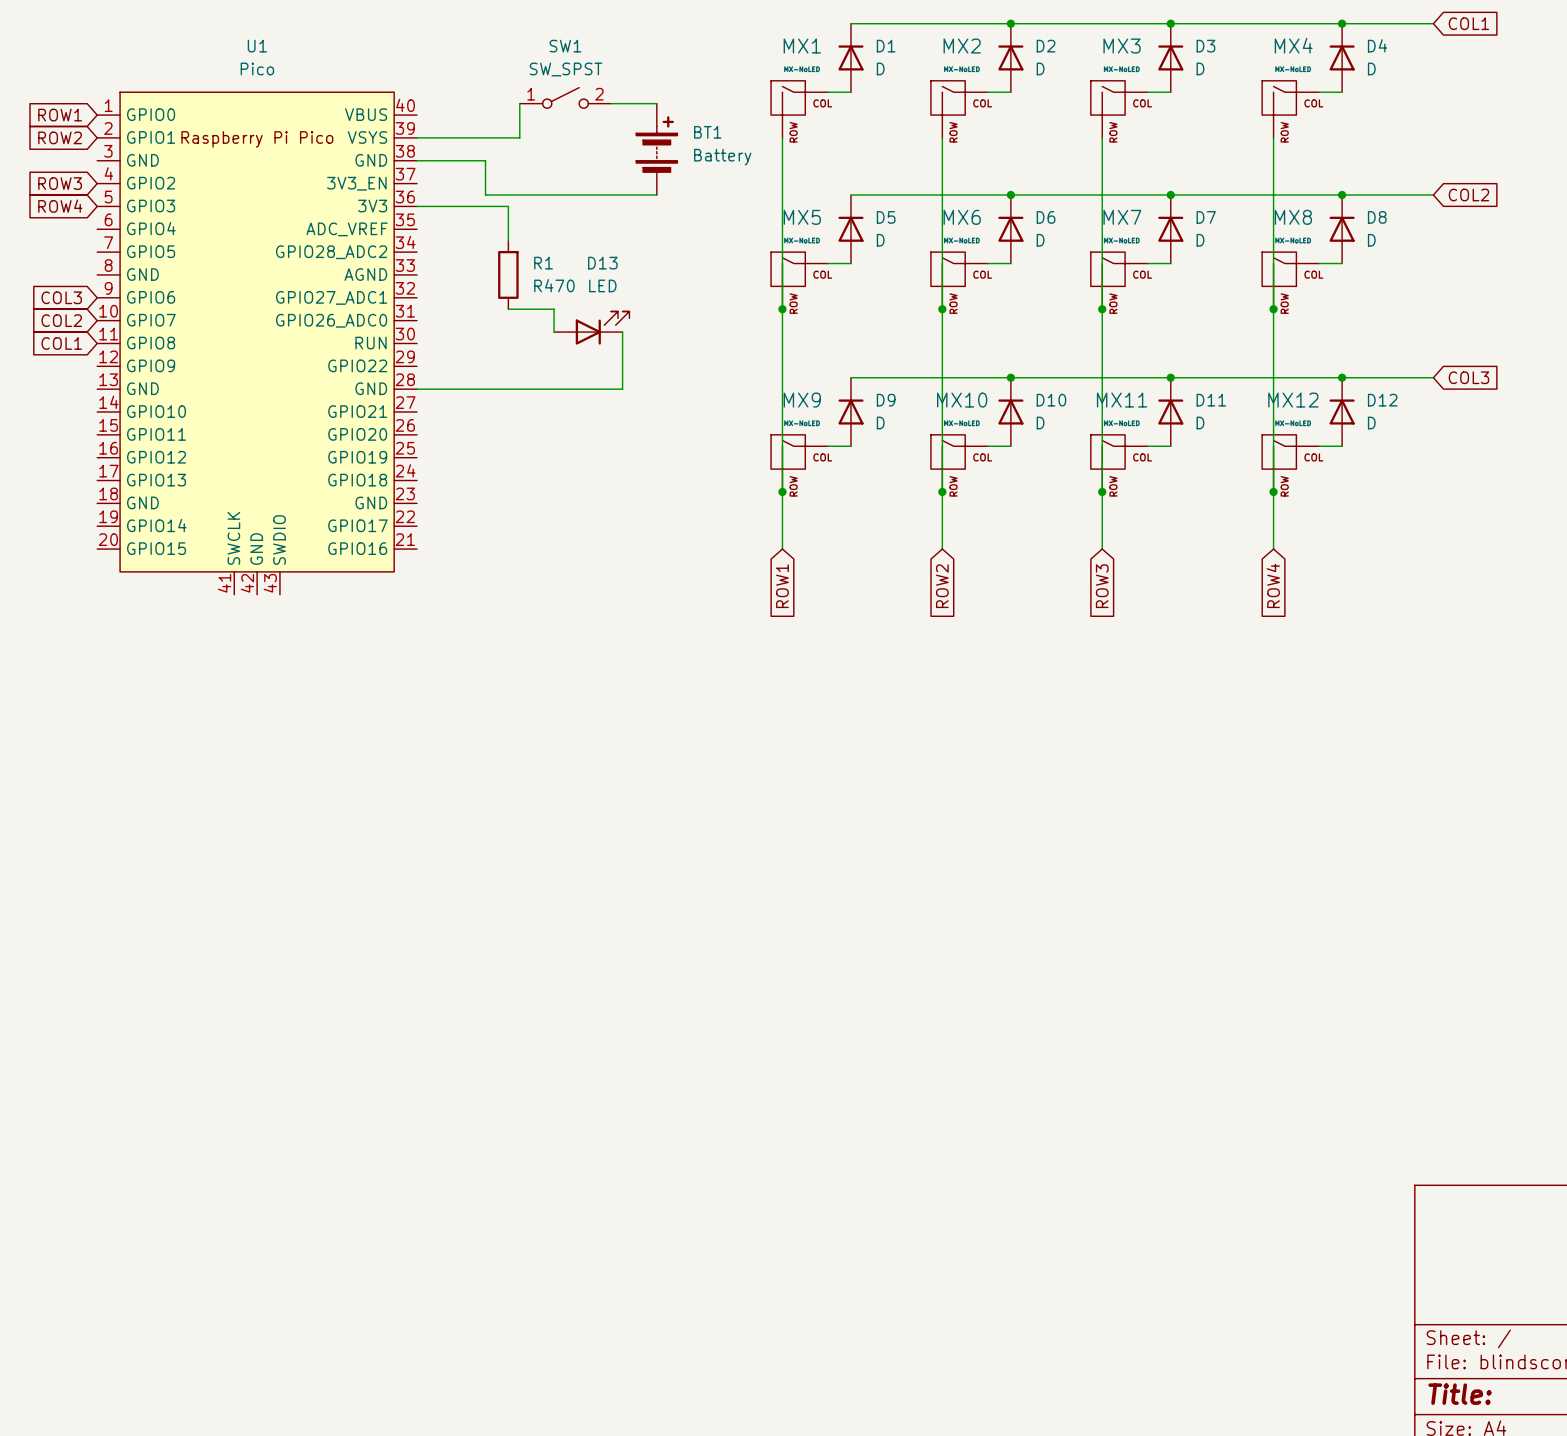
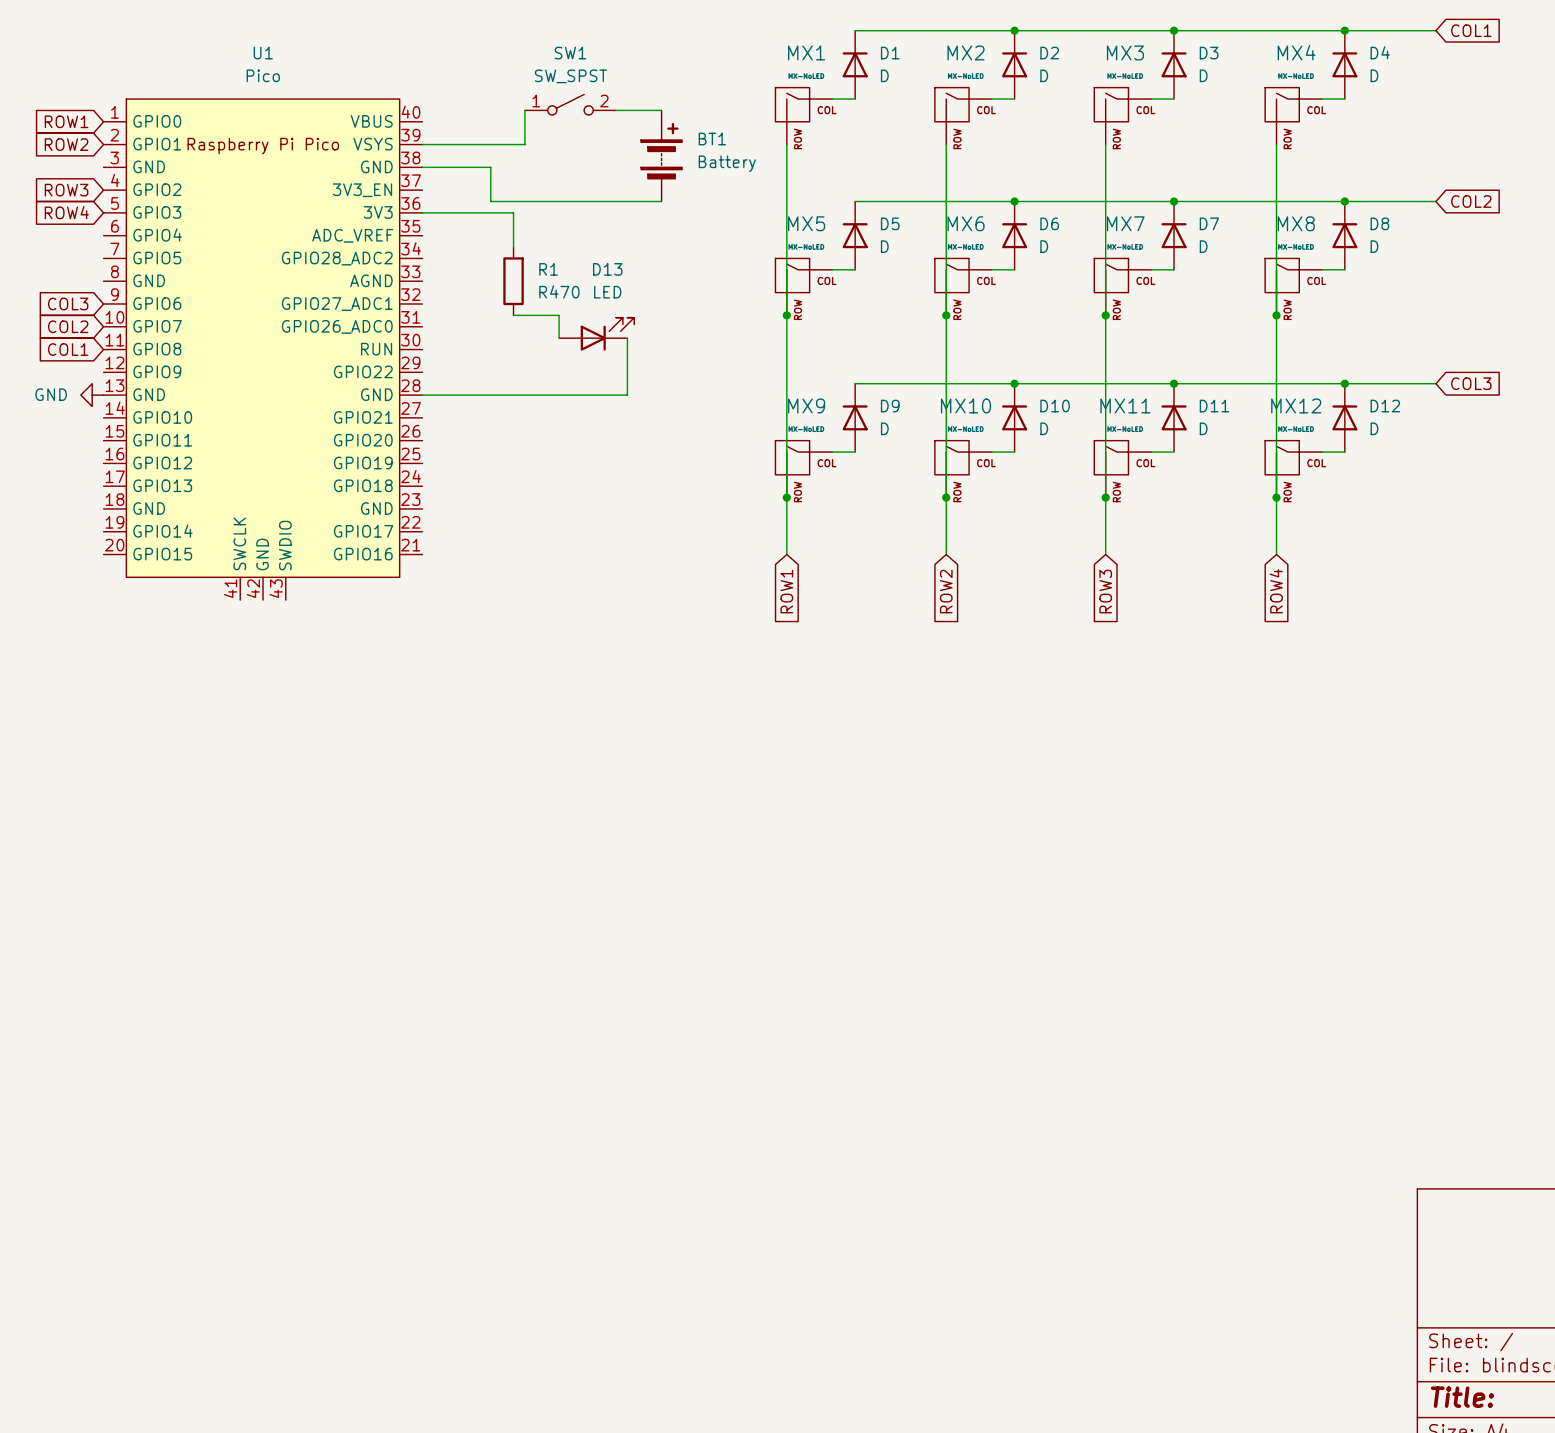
power symbol: none -> GND (92, 395)

